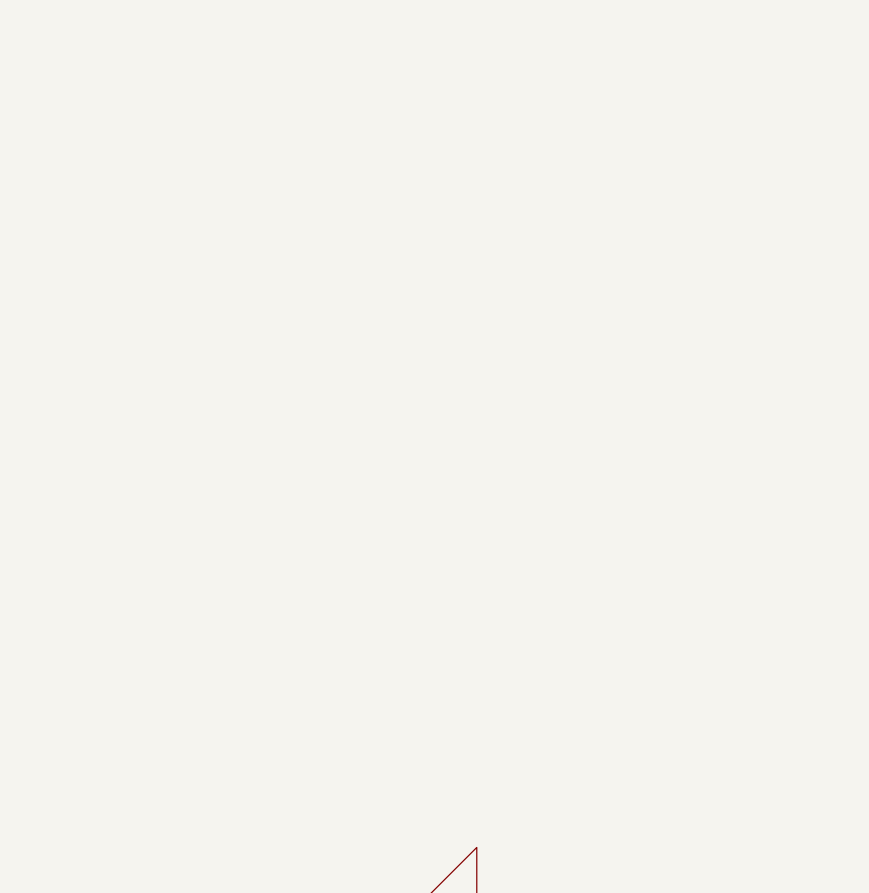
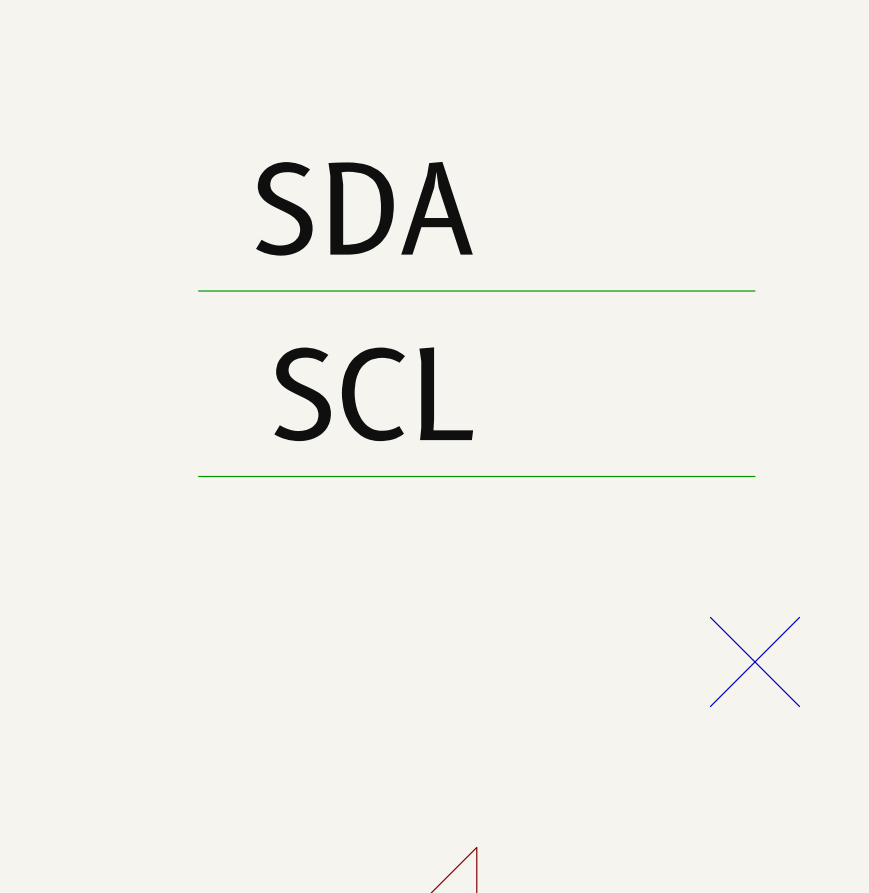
label: none -> SDA (364, 208)
wire: none -> (198, 291) (754, 291)
label: none -> SCL (373, 394)
wire: none -> (198, 476) (754, 476)
no-connect mark: none -> (754, 661)

